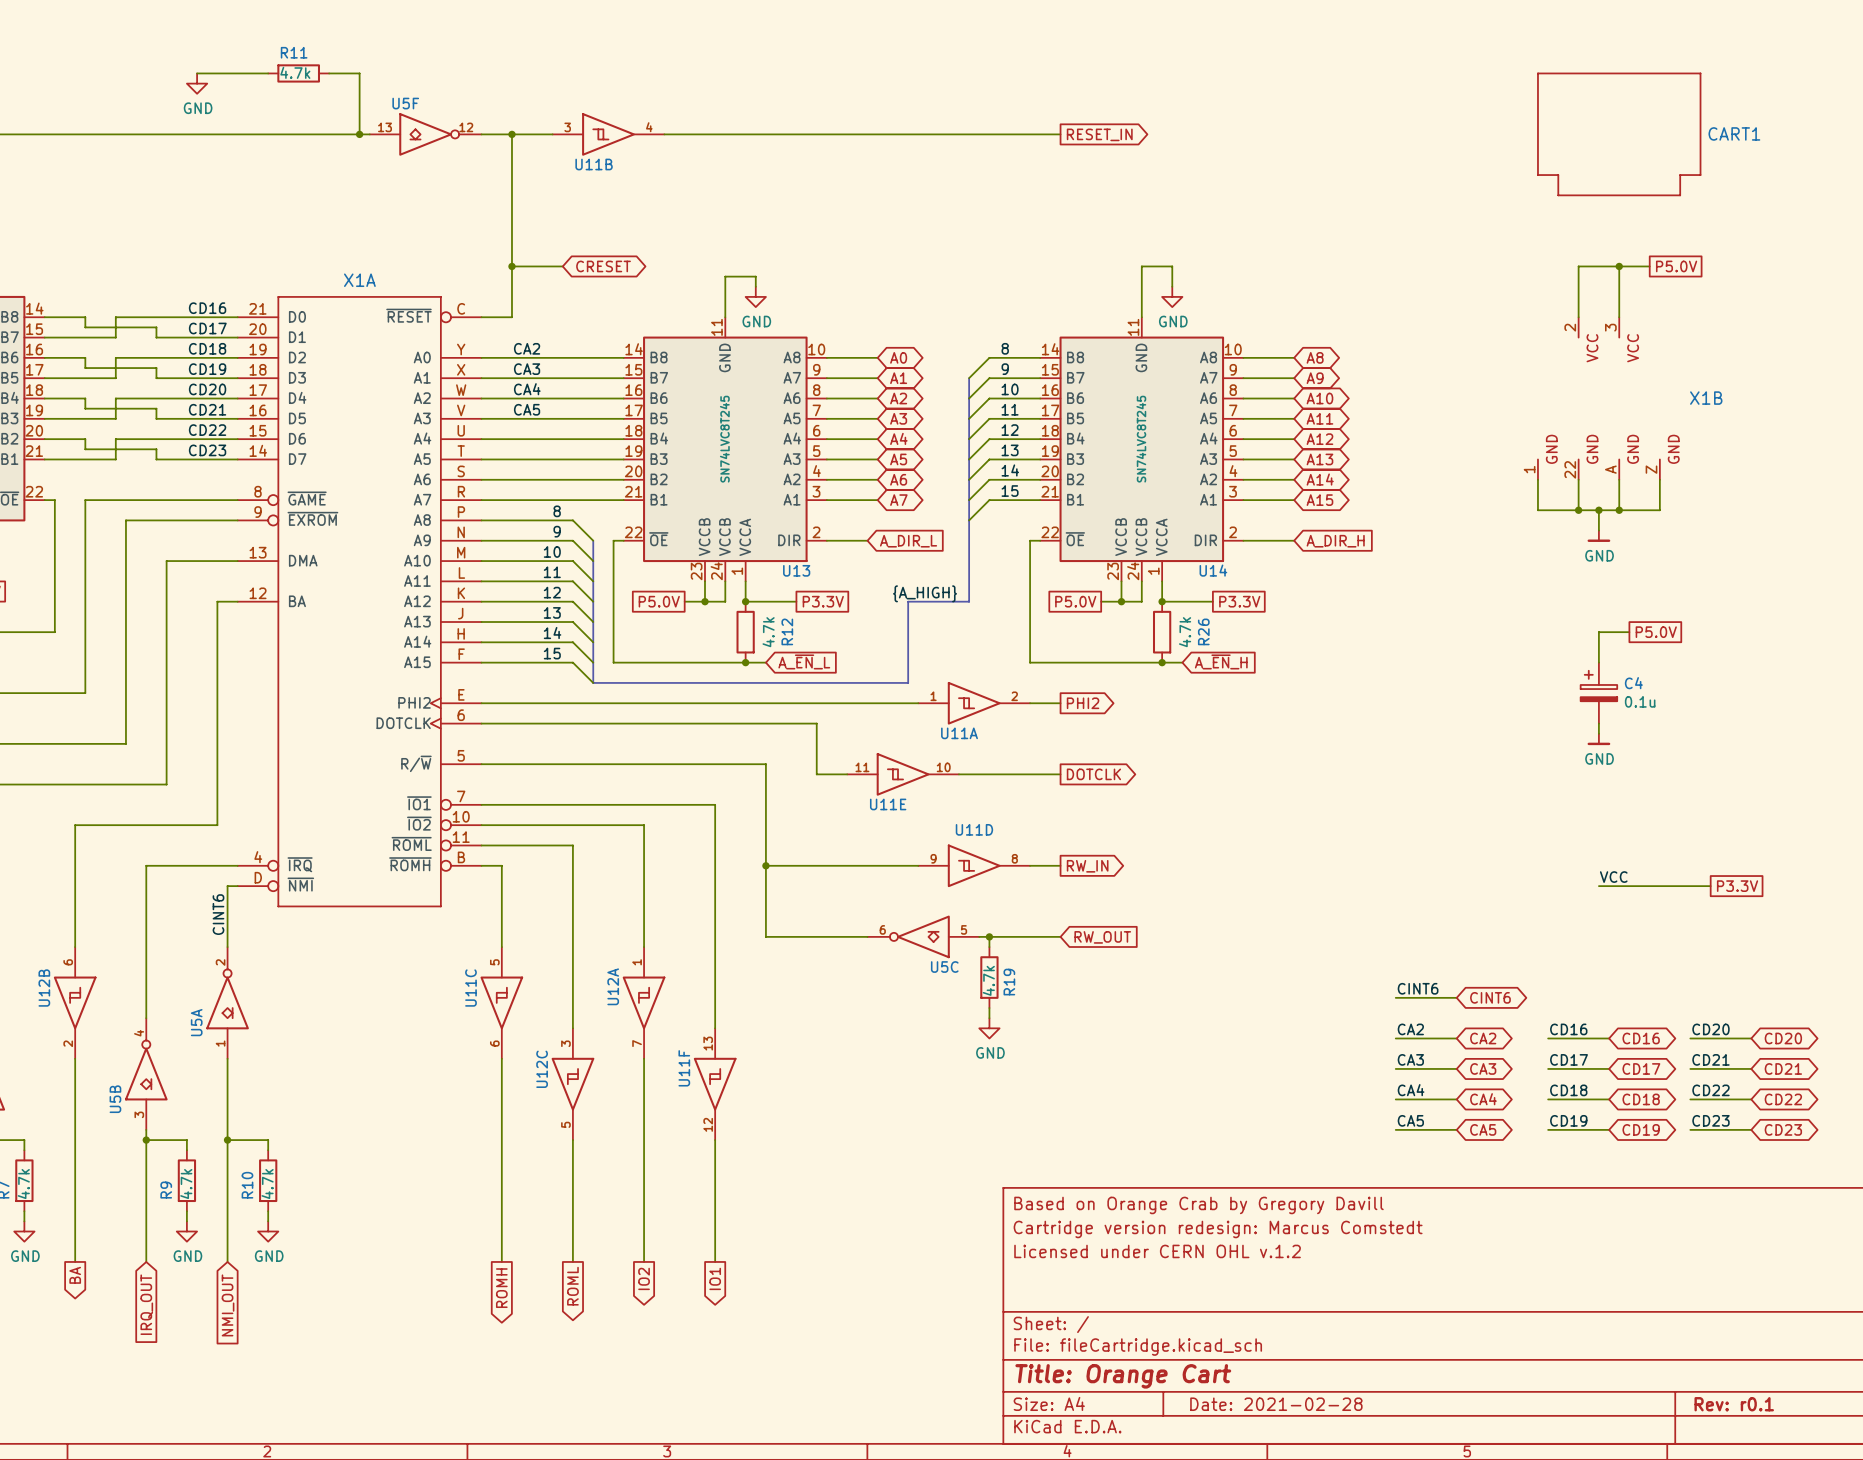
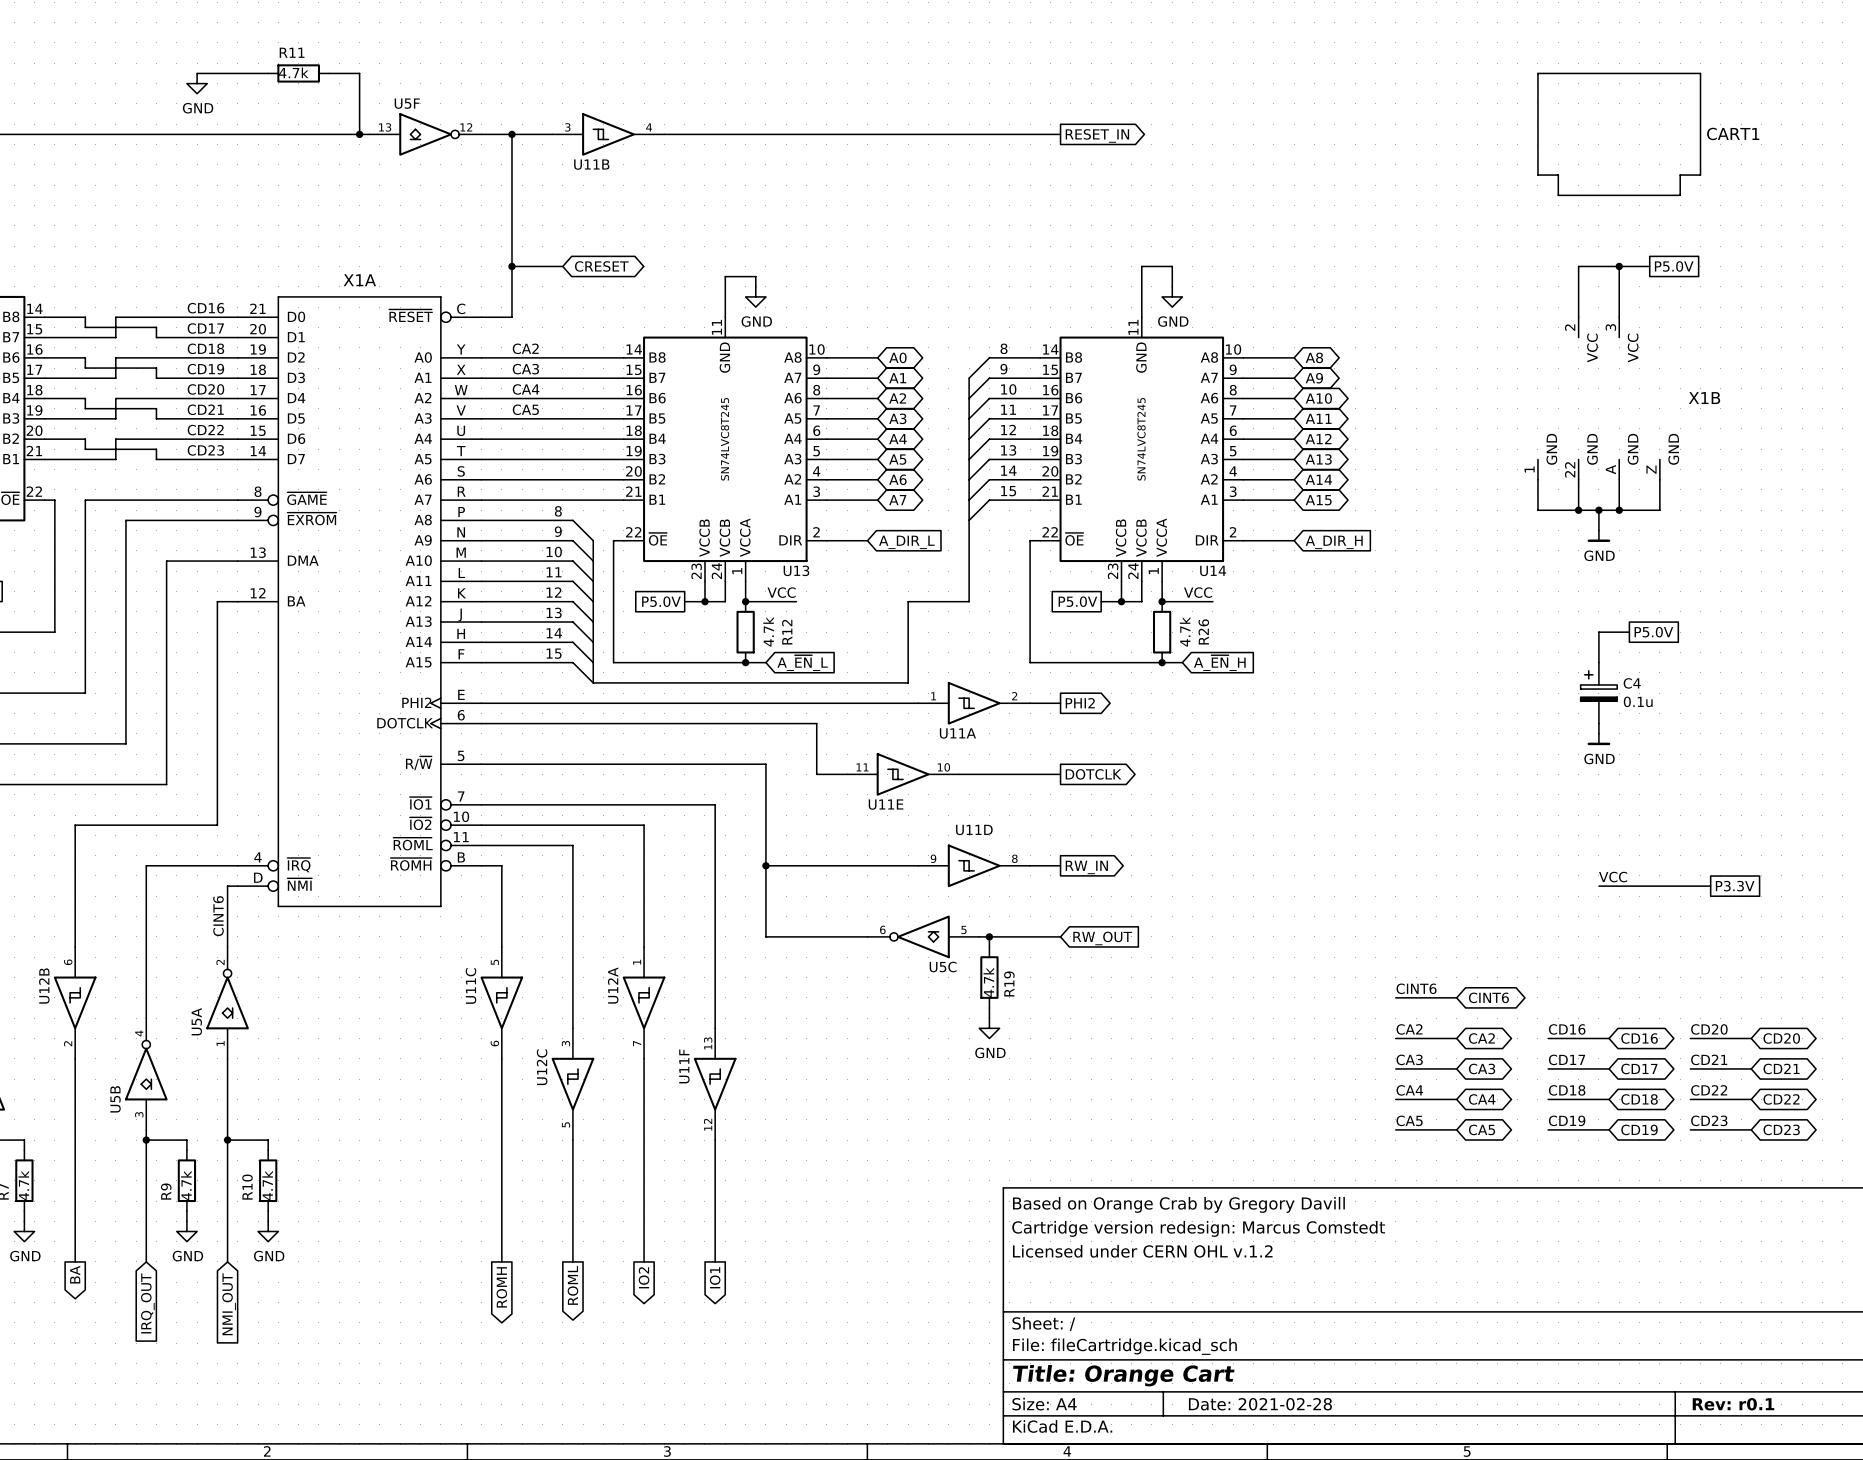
label: none -> VCC (781, 592)
label: none -> VCC (1198, 592)
label: {A_HIGH} (925, 593) -> none
global label: P3.3V (823, 601) -> none
global label: P3.3V (1239, 601) -> none

